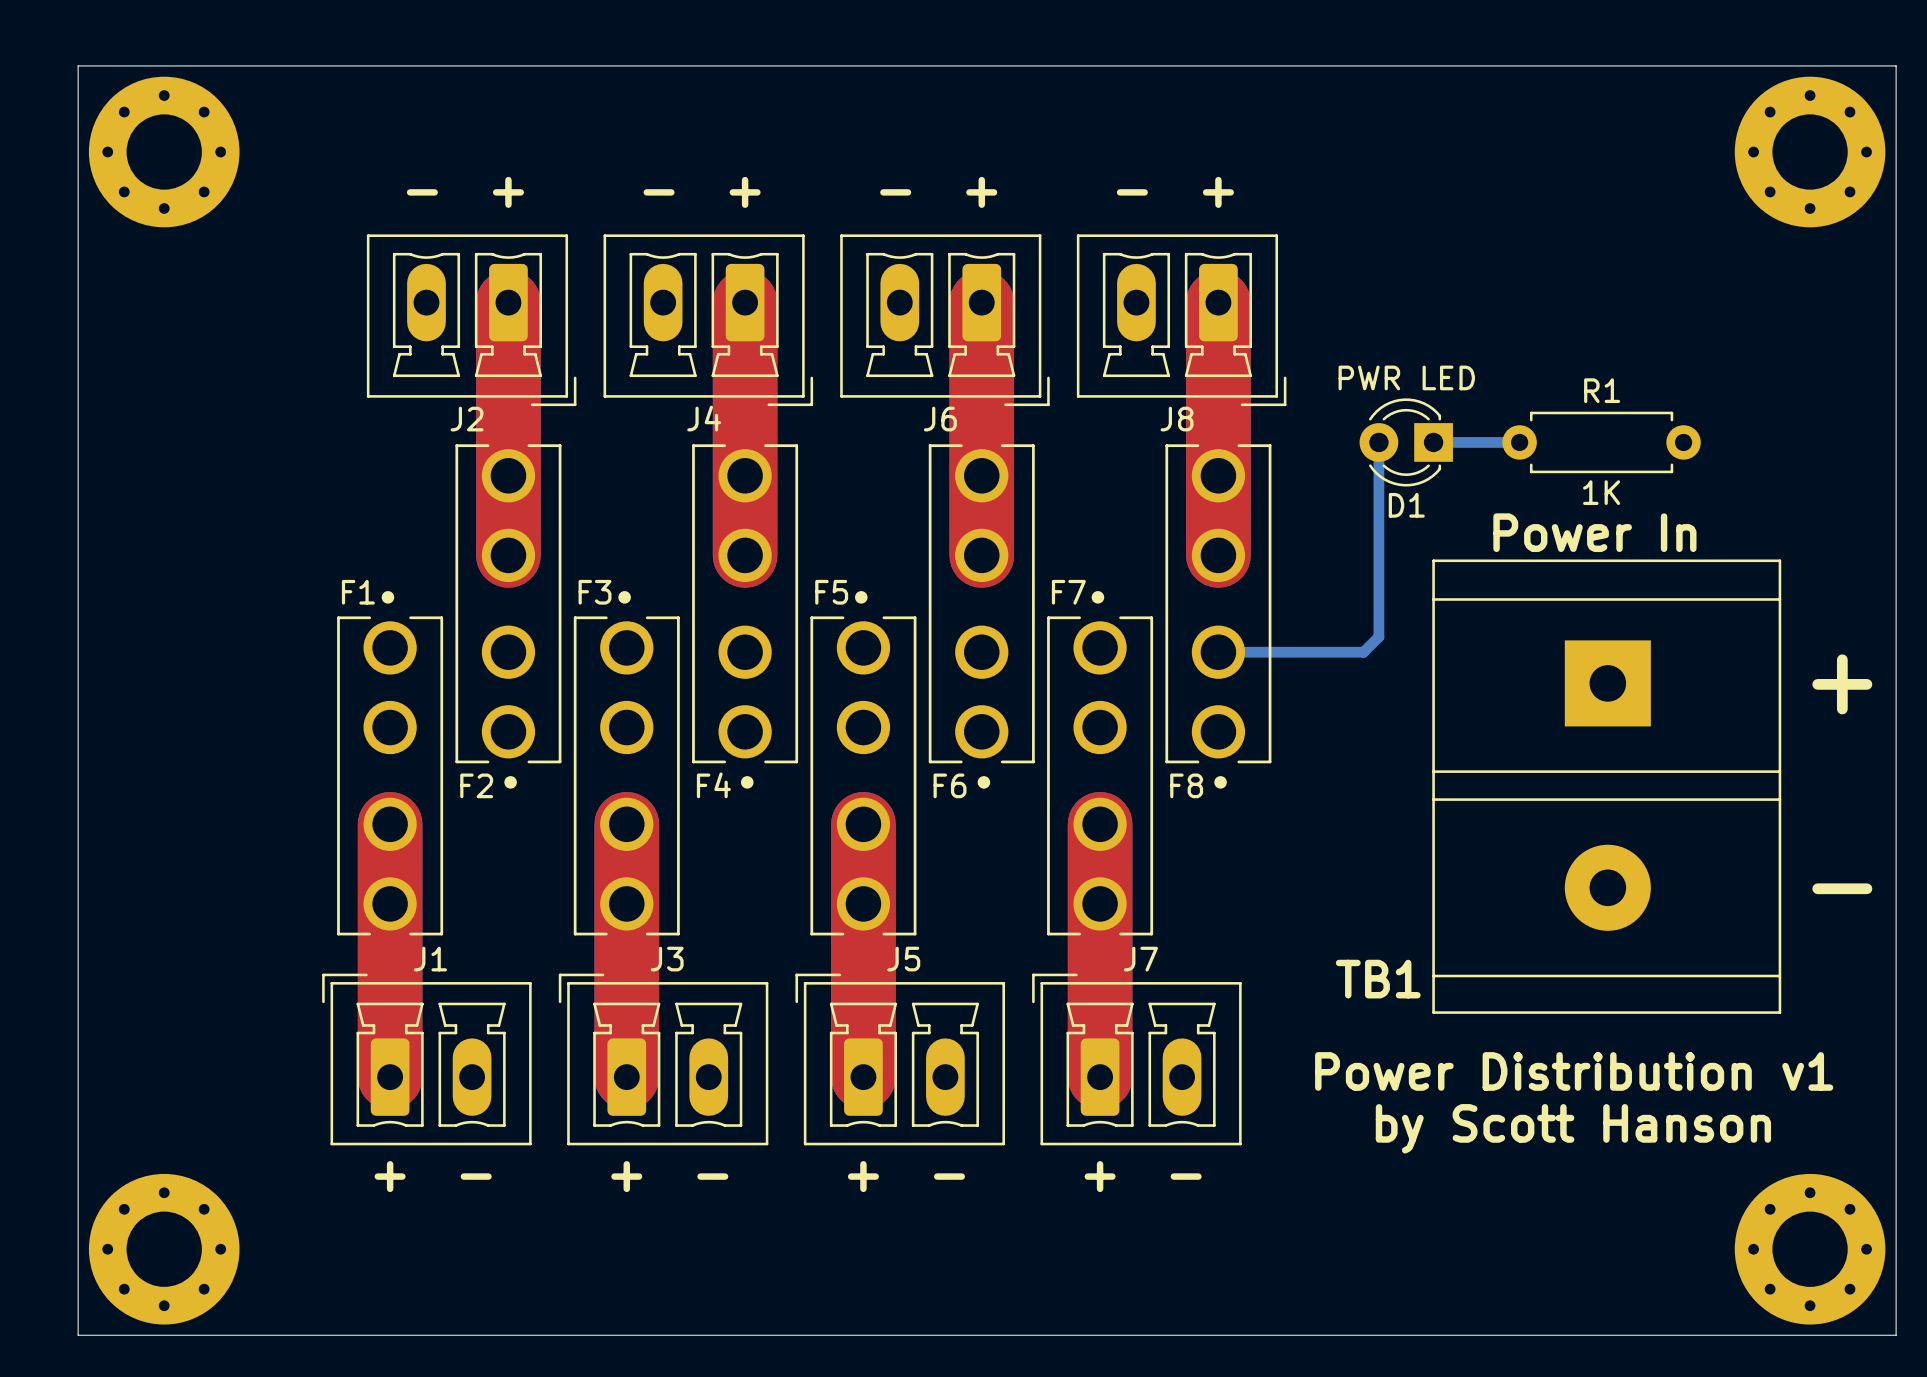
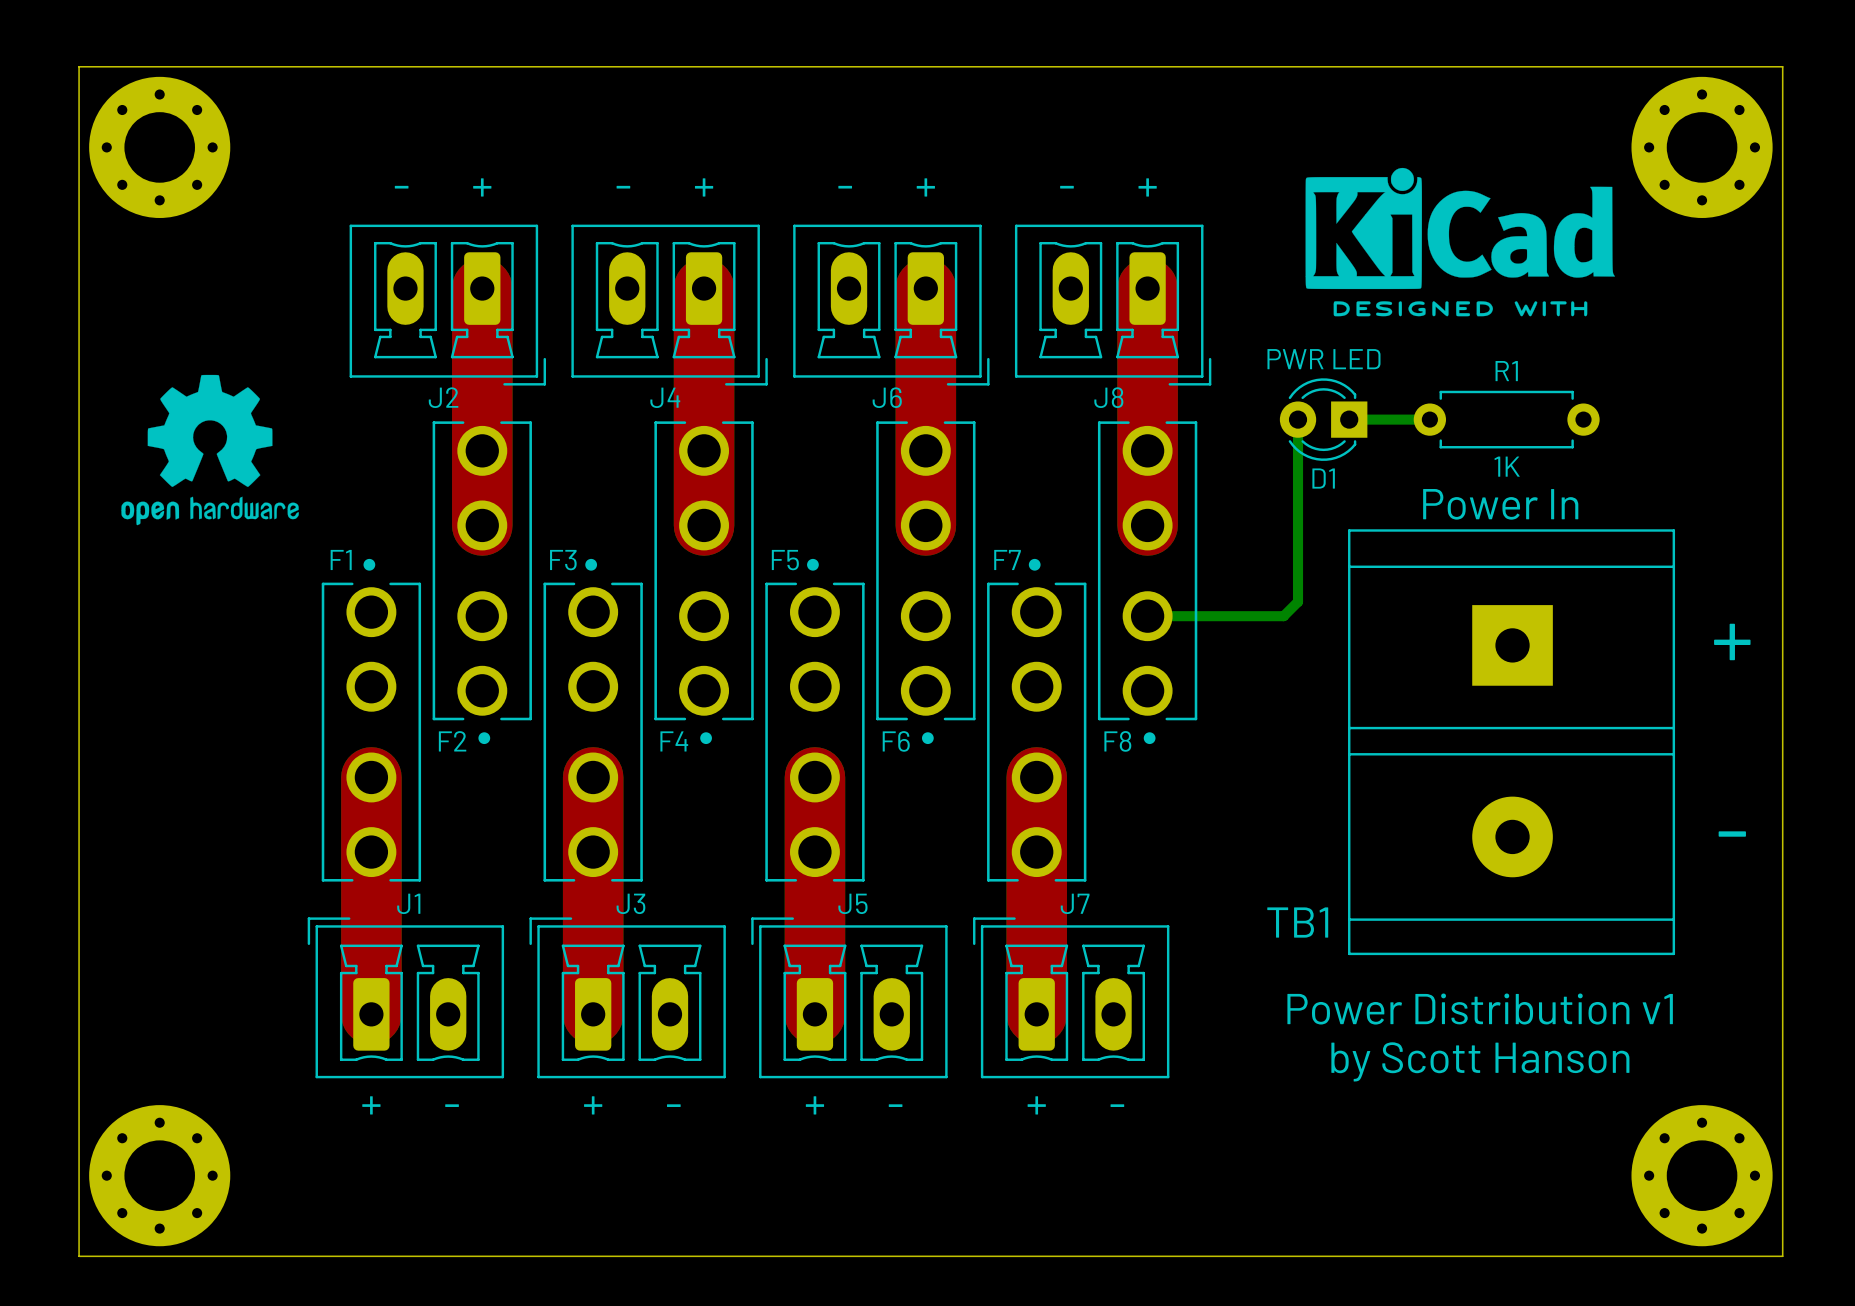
drawing: none -> [1305, 167, 1615, 317]
drawing: none -> [121, 374, 299, 526]

